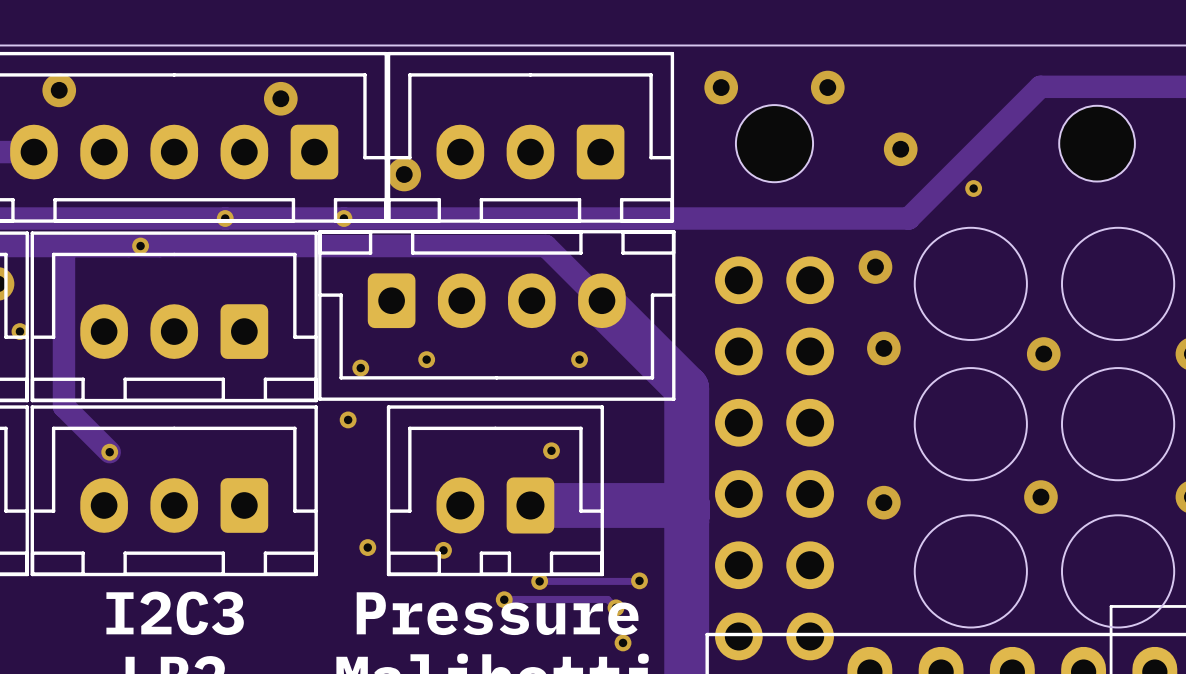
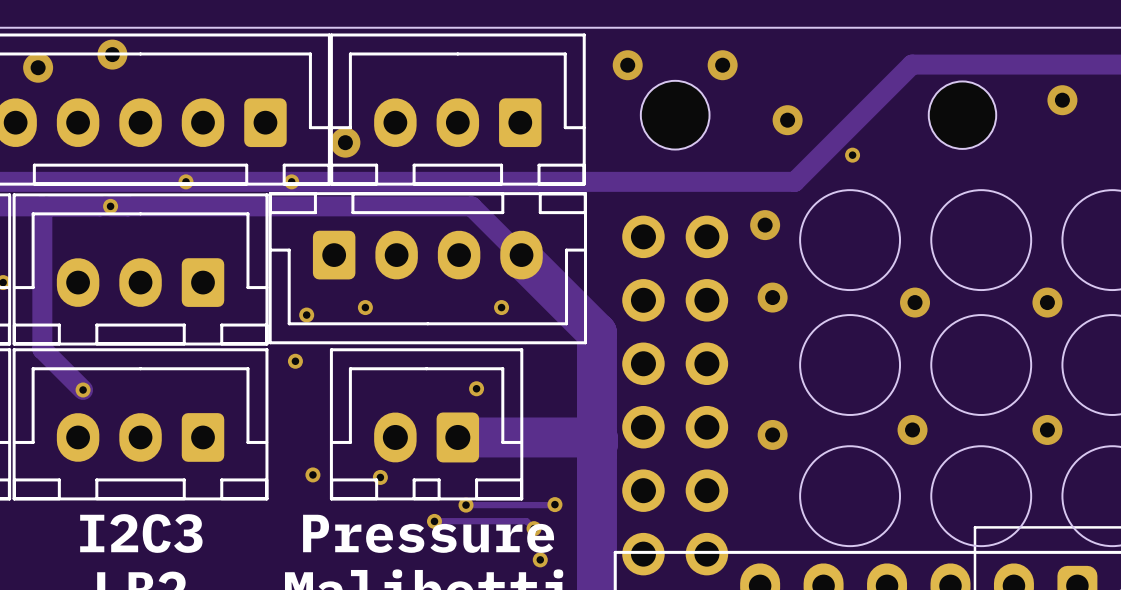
via position: (280, 98) -> (112, 54)

